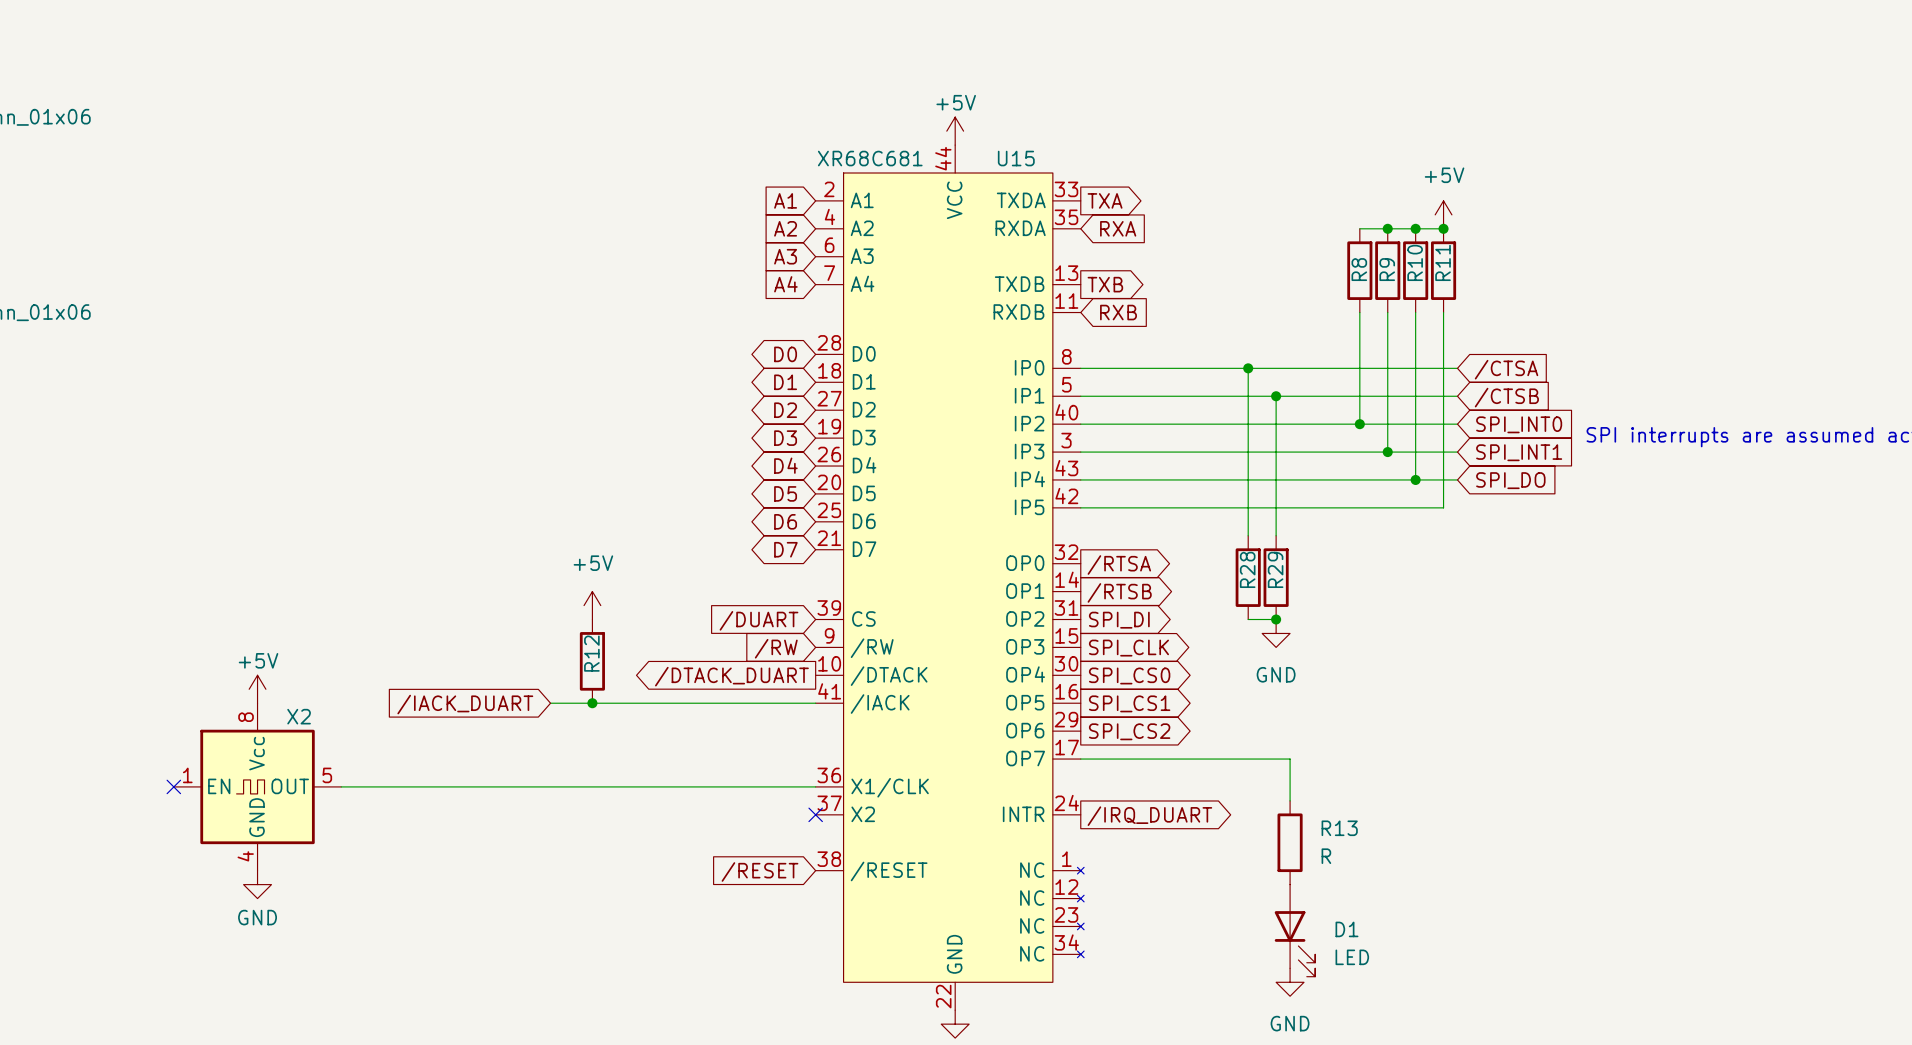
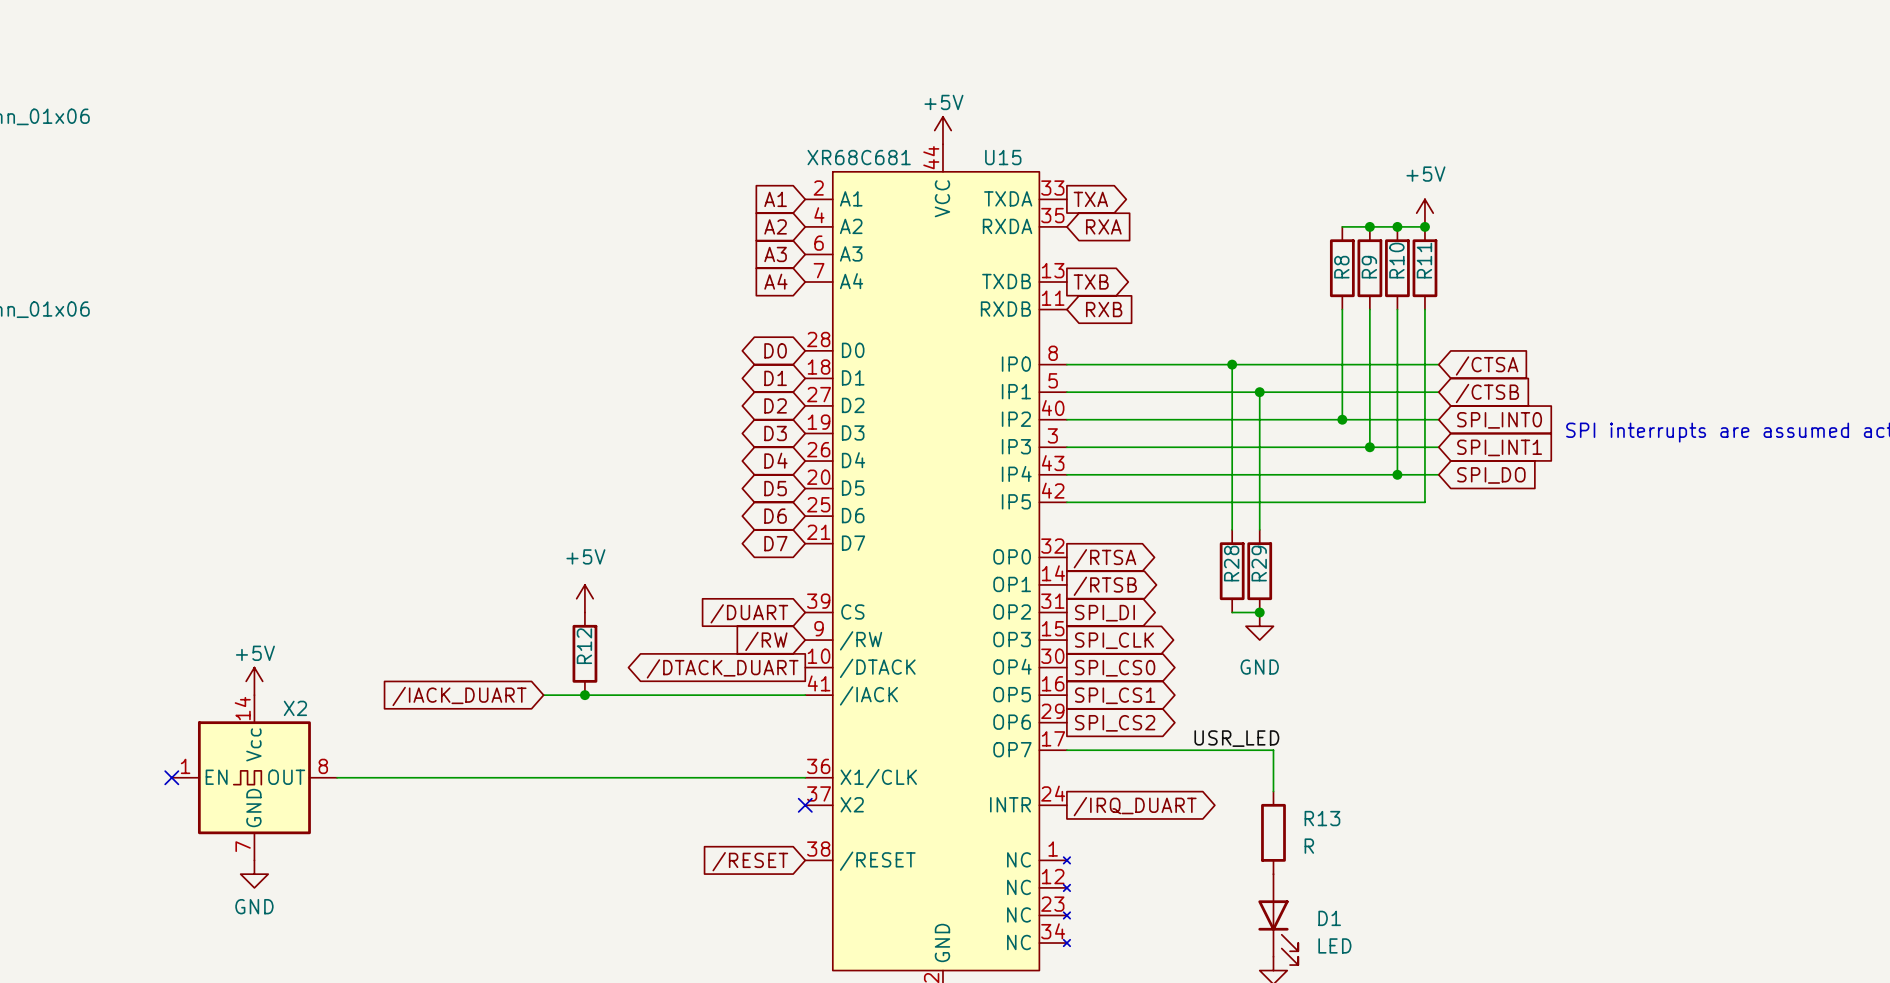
X2 pin number: 8 (246, 717) -> 14 (242, 708)
label: none -> USR_LED (1236, 738)
X2 pin number: 5 (327, 775) -> 8 (323, 766)
X2 pin number: 4 (245, 856) -> 7 (243, 846)

